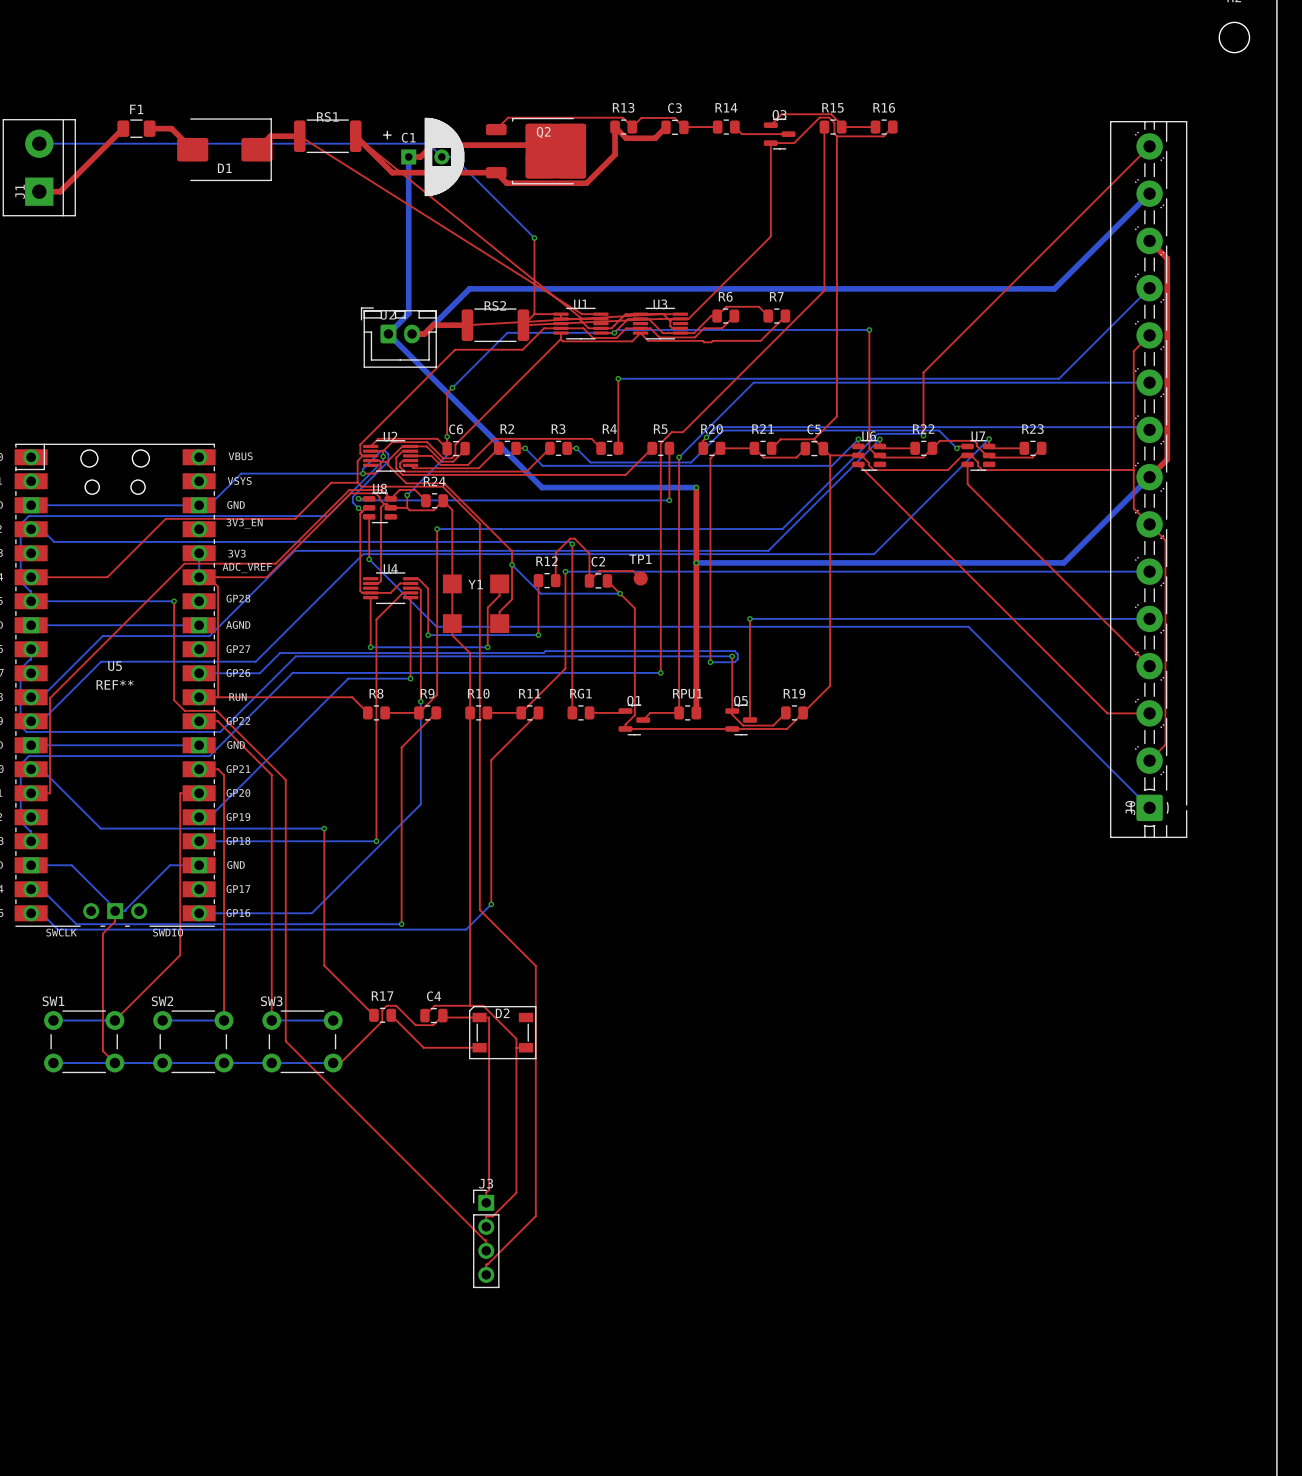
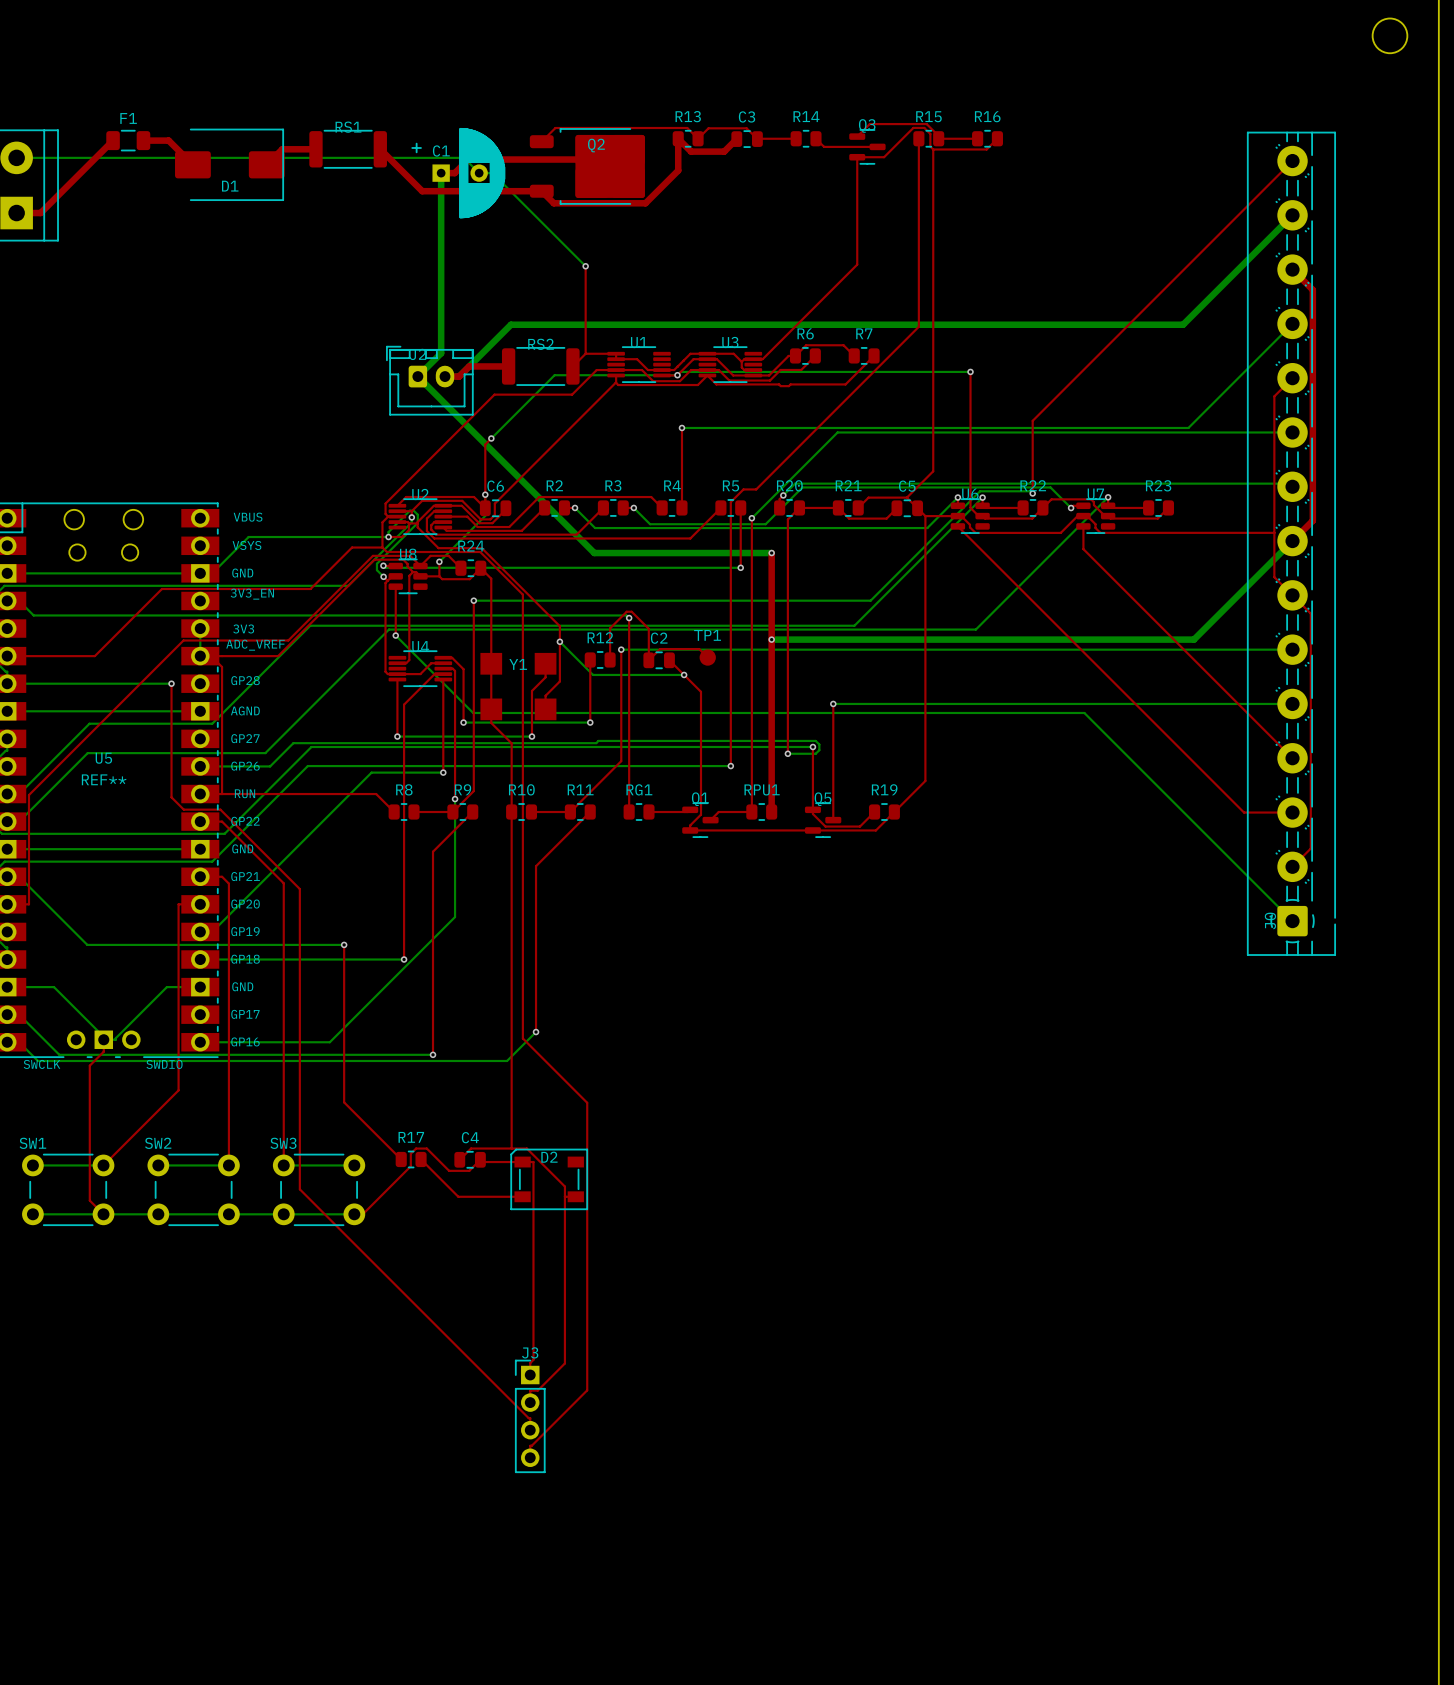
top track: (299, 136) (582, 314) (600, 314) -> none
top track: (355, 136) (582, 318) (600, 318) -> none
top track: (661, 314) (467, 325) -> none
top track: (663, 314) (680, 314) -> none
top track: (672, 318) (523, 325) -> none

